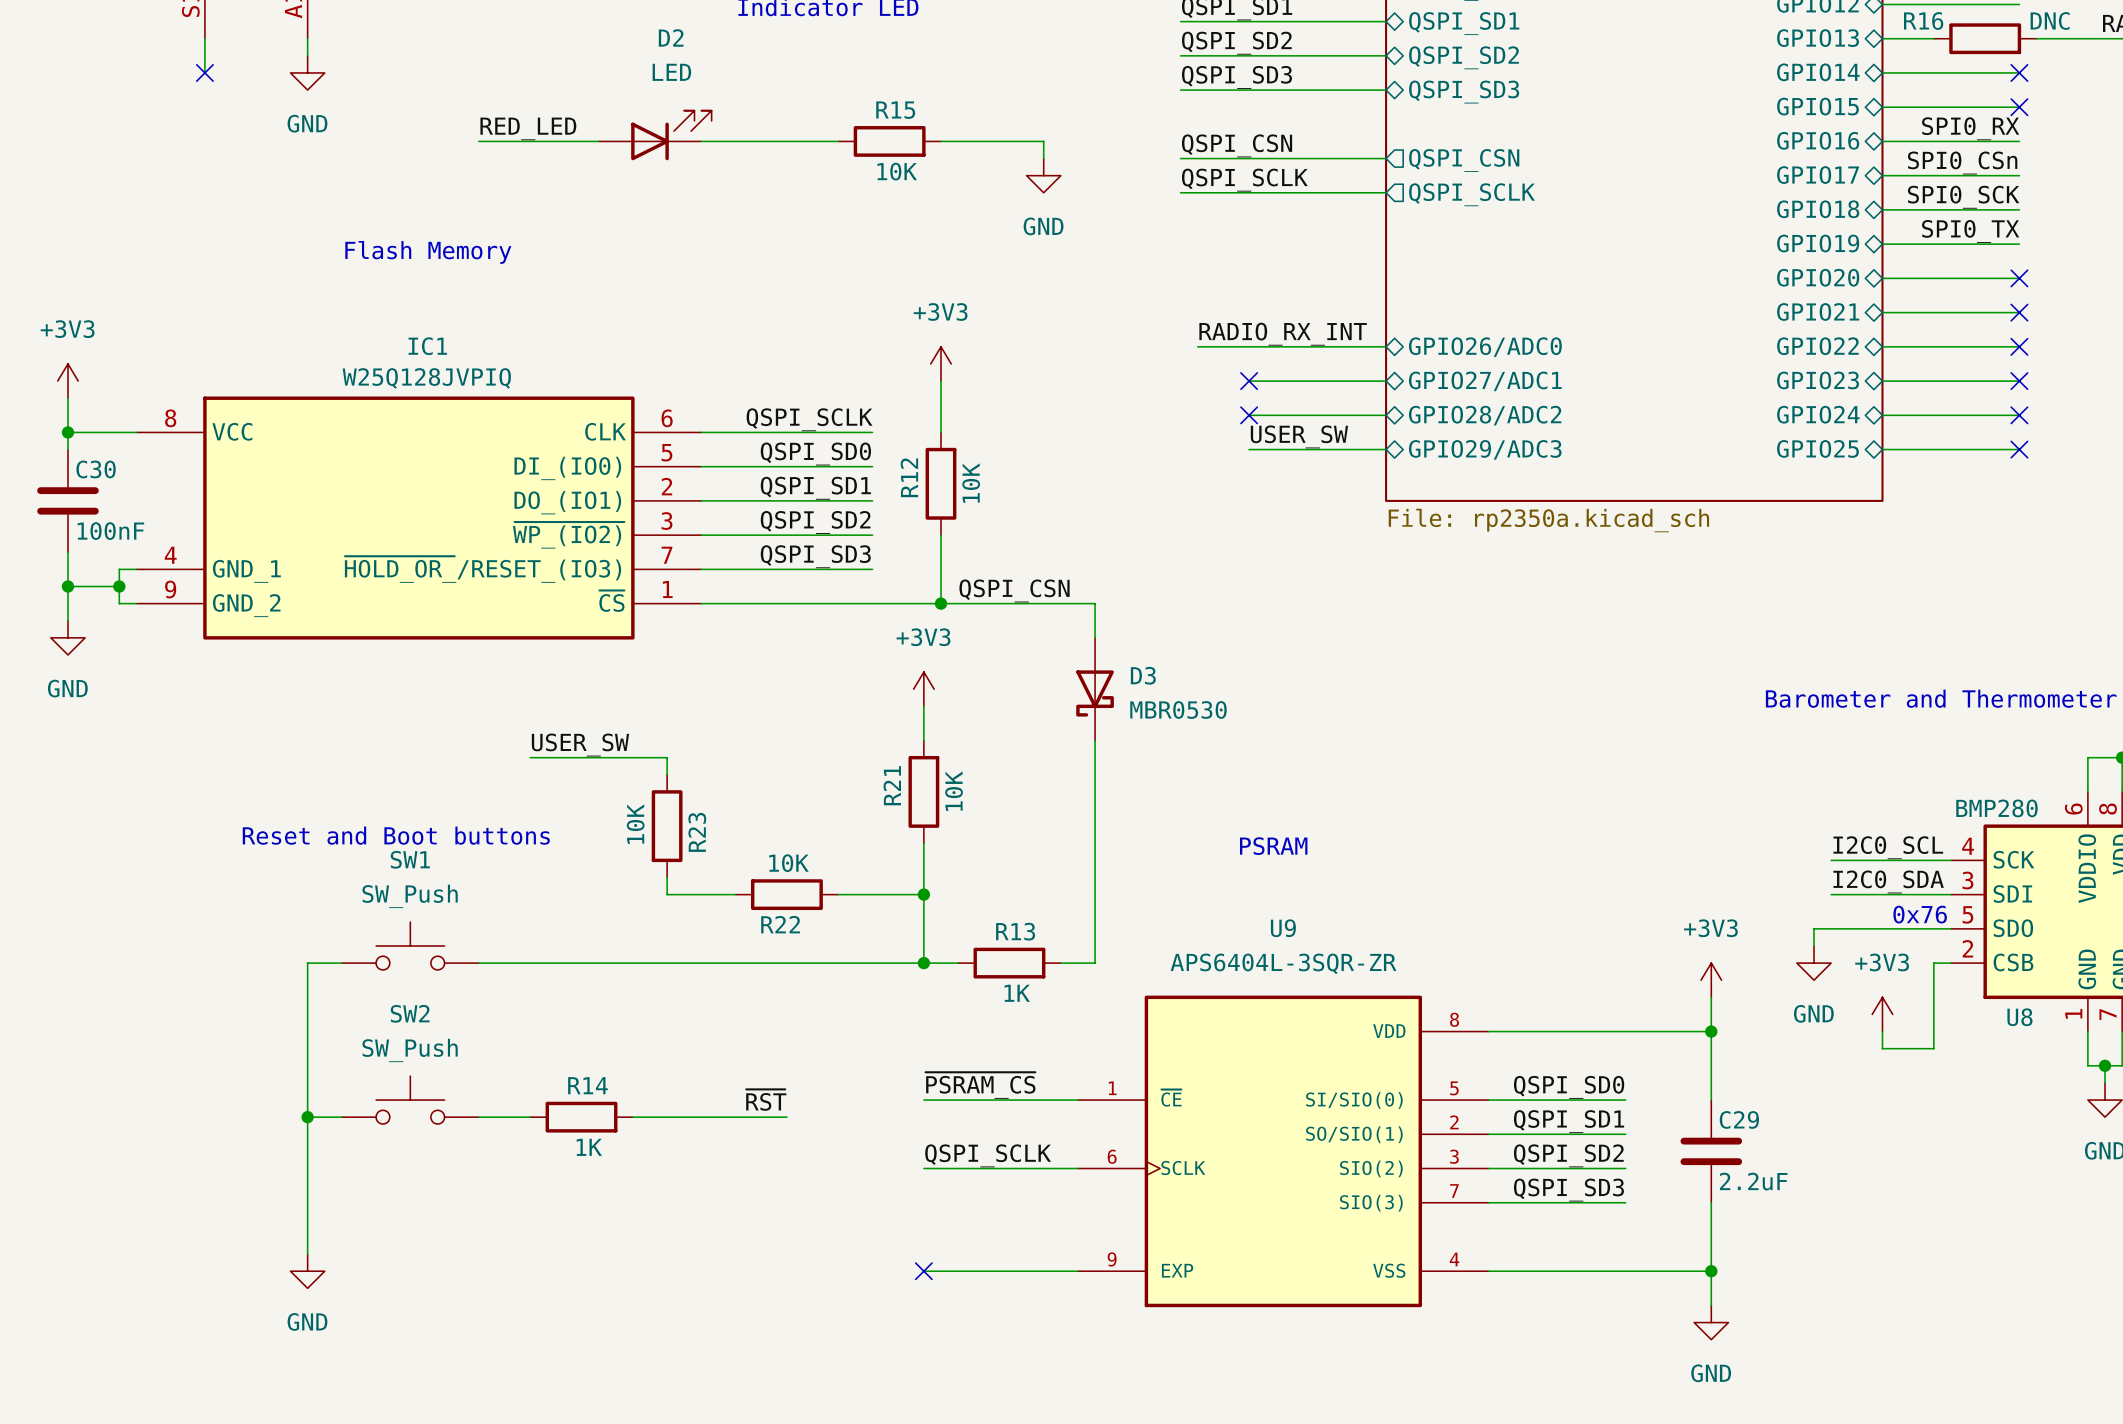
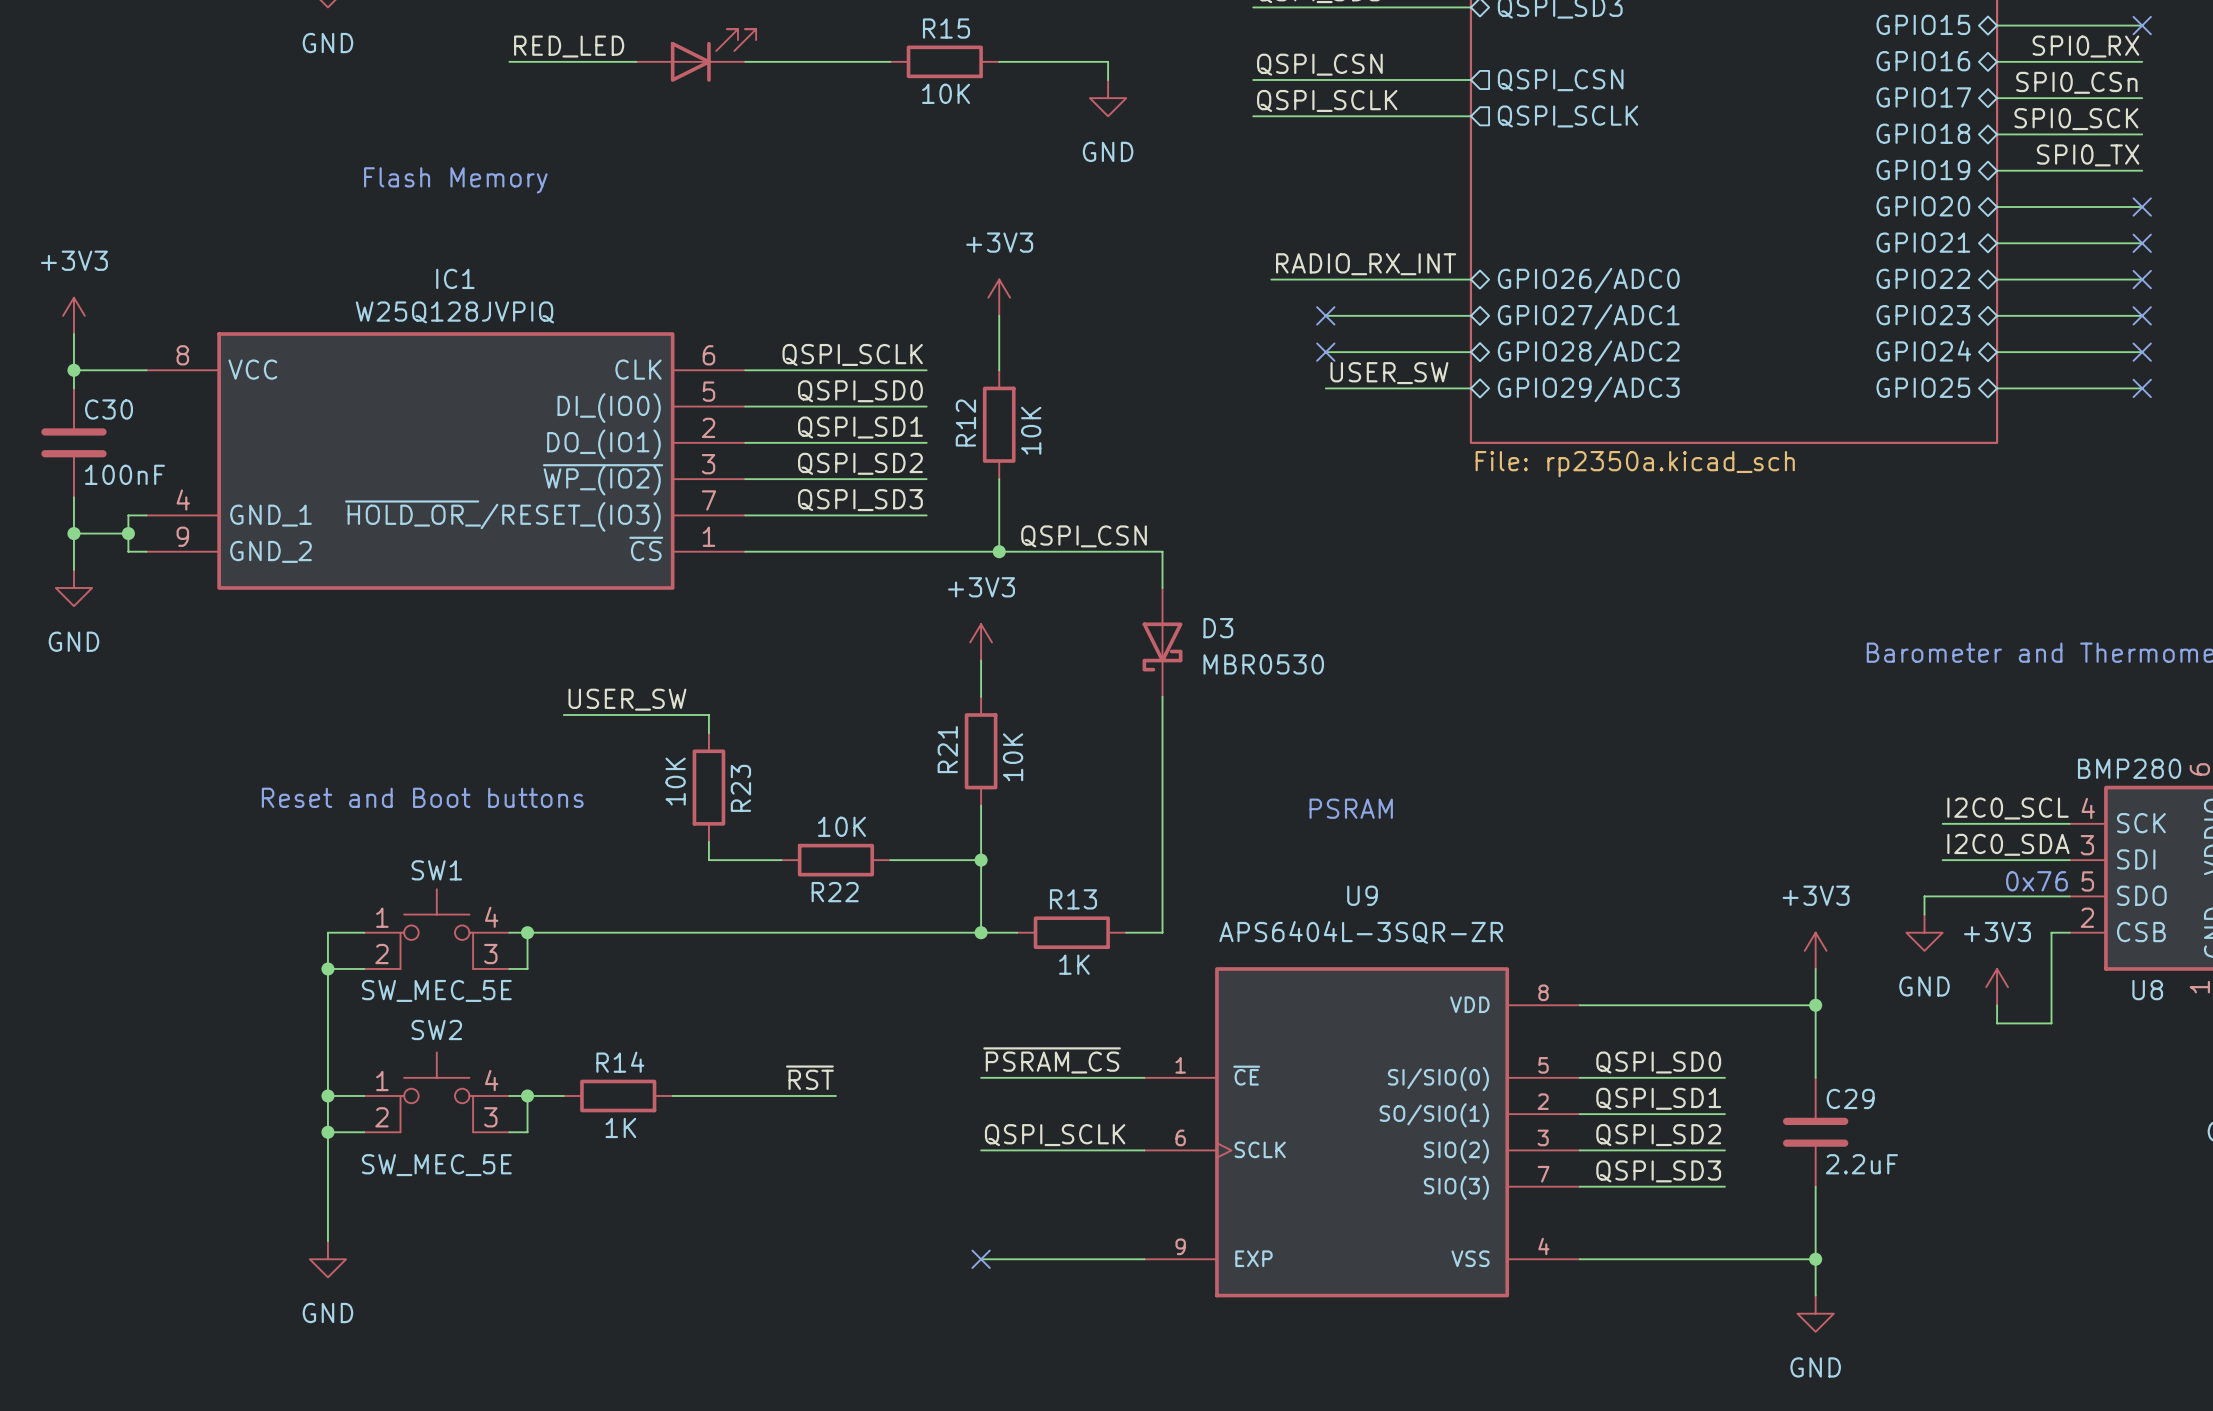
SW1 name position: SW1 (410, 859) -> SW1 (436, 870)
SW1 value: SW_Push (410, 896) -> SW_MEC_5E (436, 990)
SW1 symbol: [341, 922, 479, 970] -> [364, 889, 510, 969]
wire: none -> (527, 932) (527, 968) (509, 968)
junction: none -> (527, 932)
wire: none -> (327, 968) (364, 968)
junction: none -> (327, 968)
SW2 name position: SW2 (410, 1013) -> SW2 (436, 1029)
SW2 value: SW_Push (410, 1050) -> SW_MEC_5E (436, 1165)
SW2 symbol: [341, 1076, 479, 1125] -> [364, 1052, 510, 1133]
wire: none -> (527, 1095) (527, 1132) (509, 1132)
junction: none -> (527, 1095)
wire: none -> (327, 1132) (364, 1132)
junction: none -> (327, 1132)

